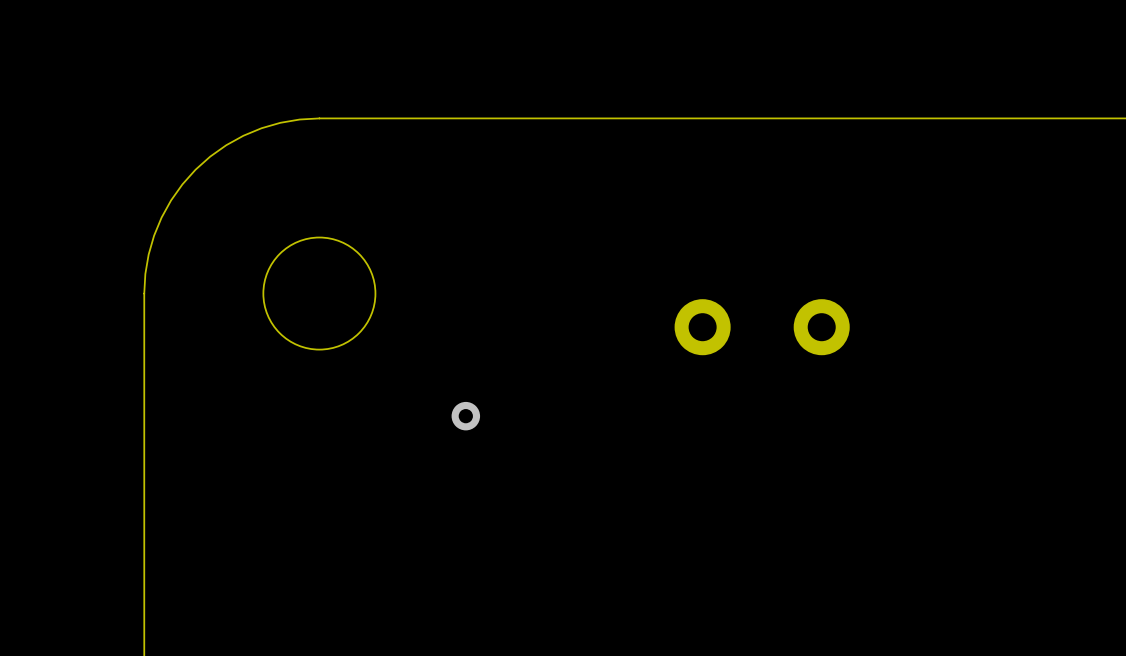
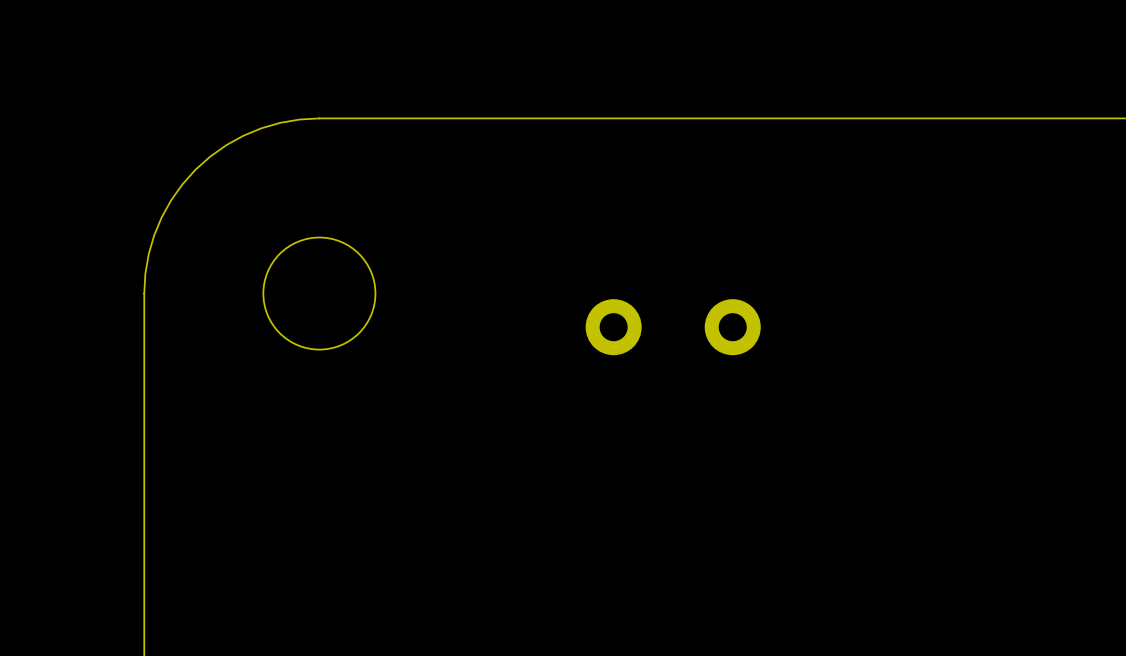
part position: (762, 327) -> (673, 327)
via: (465, 416) -> none

